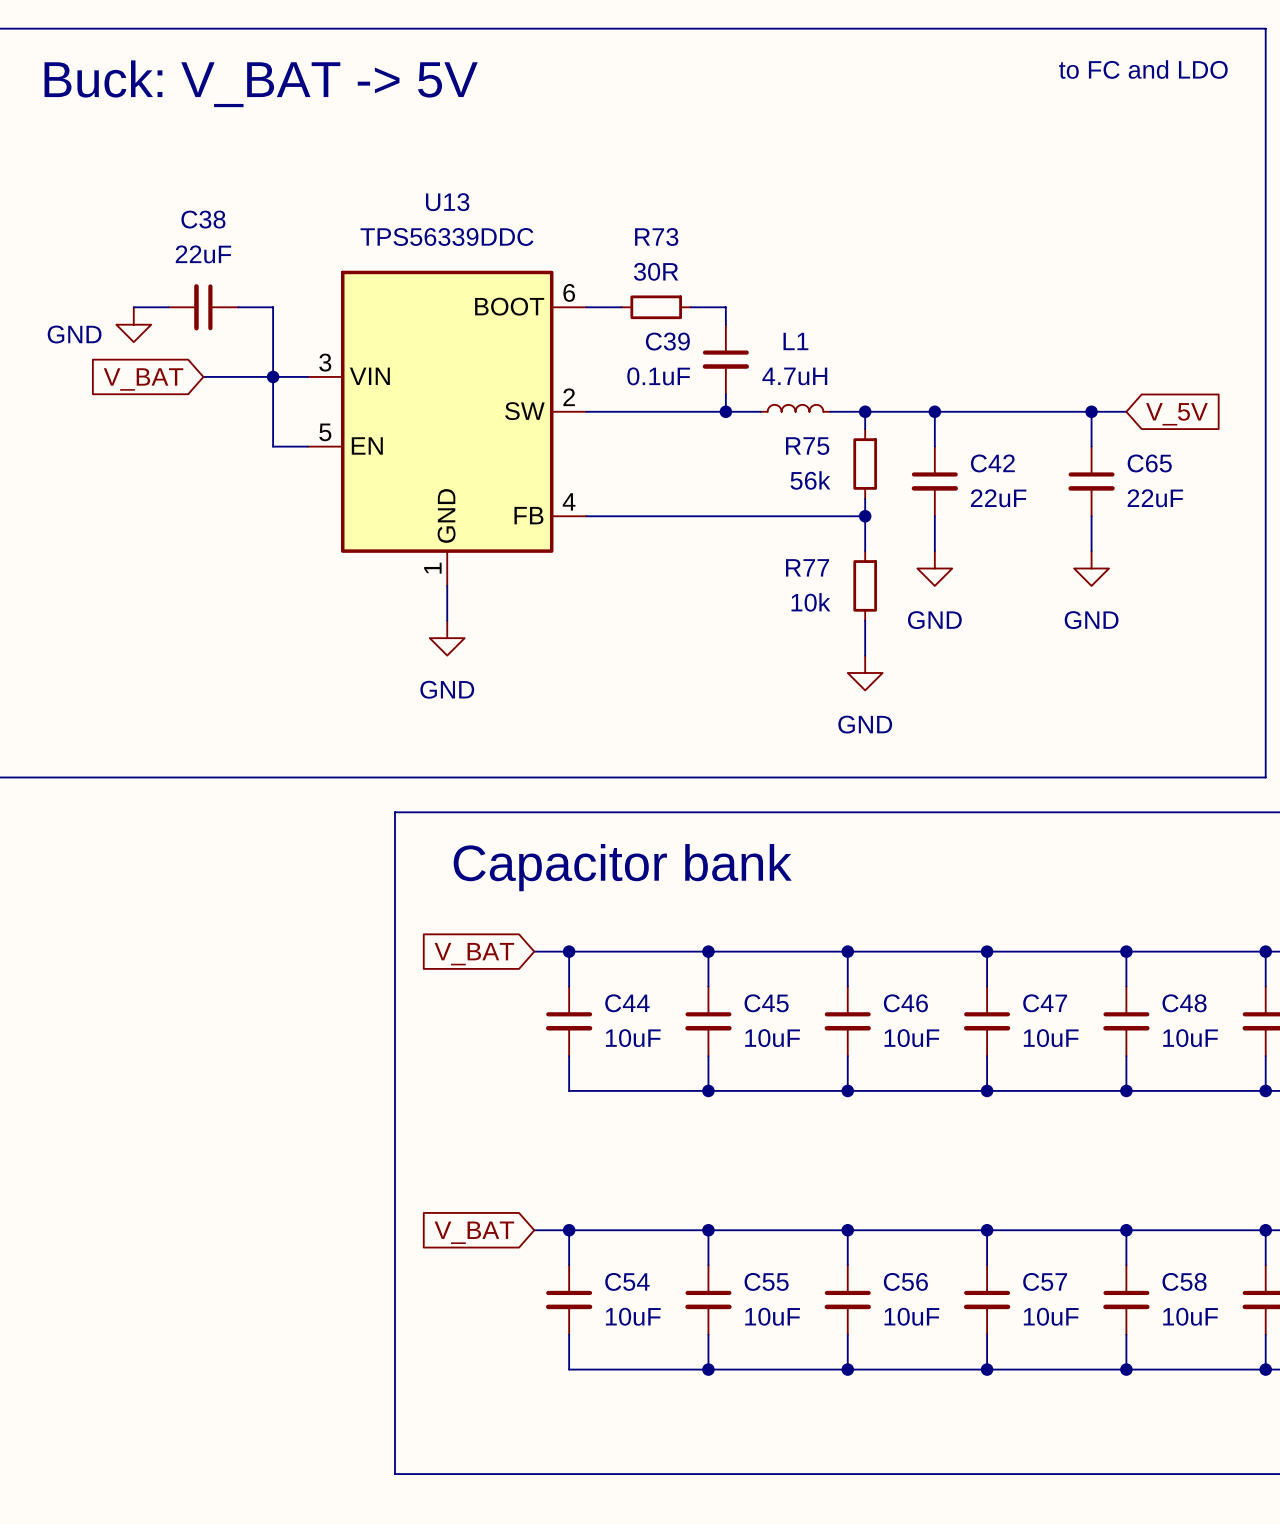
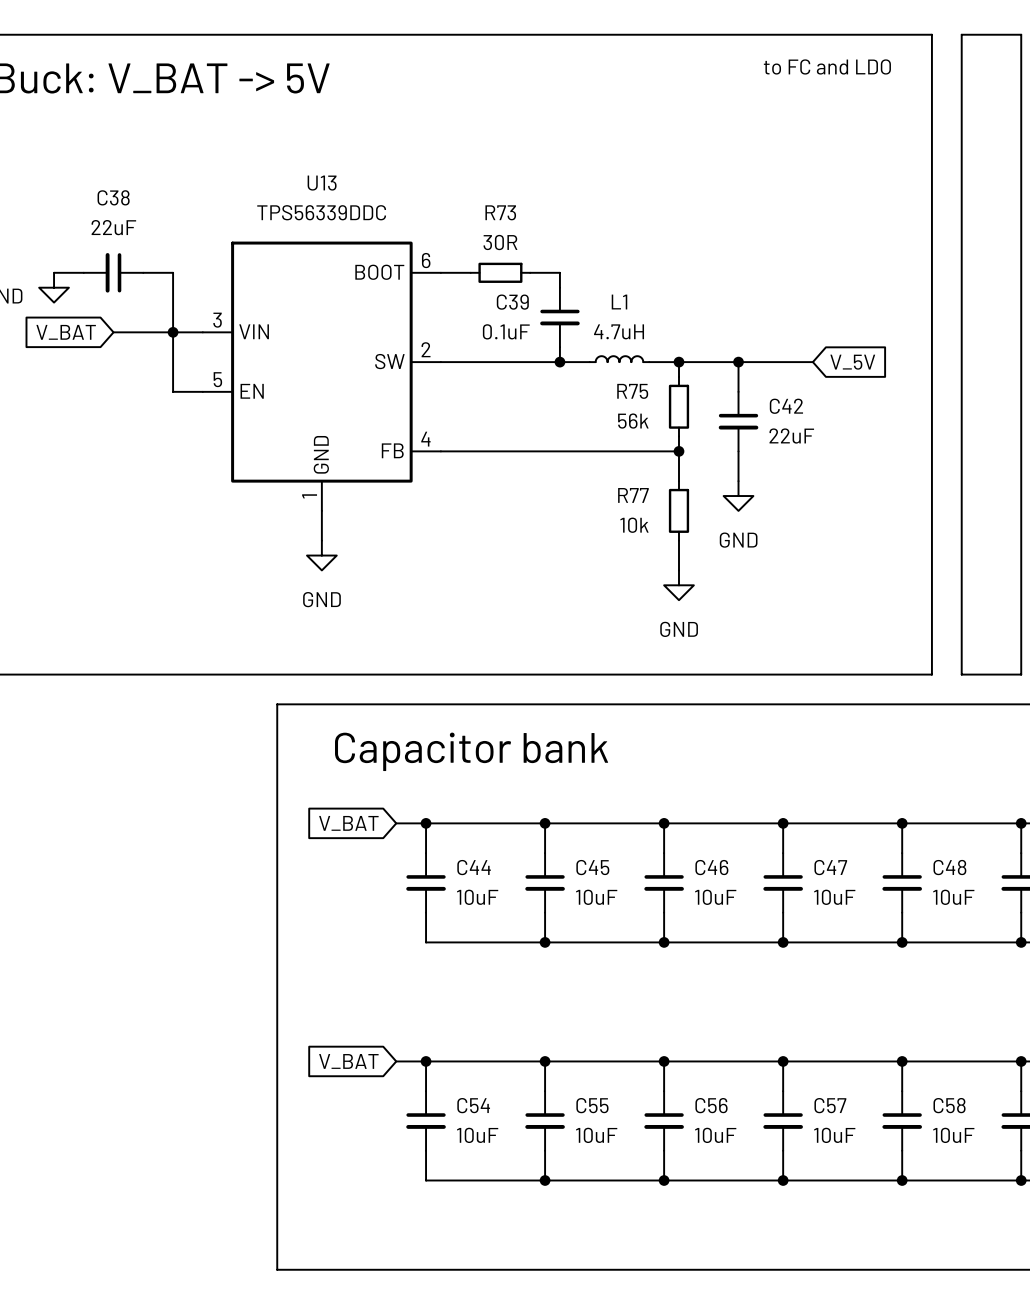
line: (1161, 28) (1196, 28) -> (931, 34) (931, 674)
text position: to FC and LDO (1143, 69) -> to FC and LDO (827, 66)
wire: (1021, 411) (1126, 411) -> none
wire: (1091, 411) (1091, 446) -> none
junction: (1091, 411) -> none
global label position: V_5V (1176, 414) -> V_5V (852, 362)
C65: 22uF (1091, 481) -> none
wire: (1091, 516) (1091, 551) -> none
power symbol: GND (1091, 568) -> none
line: (1161, 777) (1196, 777) -> (961, 34) (961, 674)

